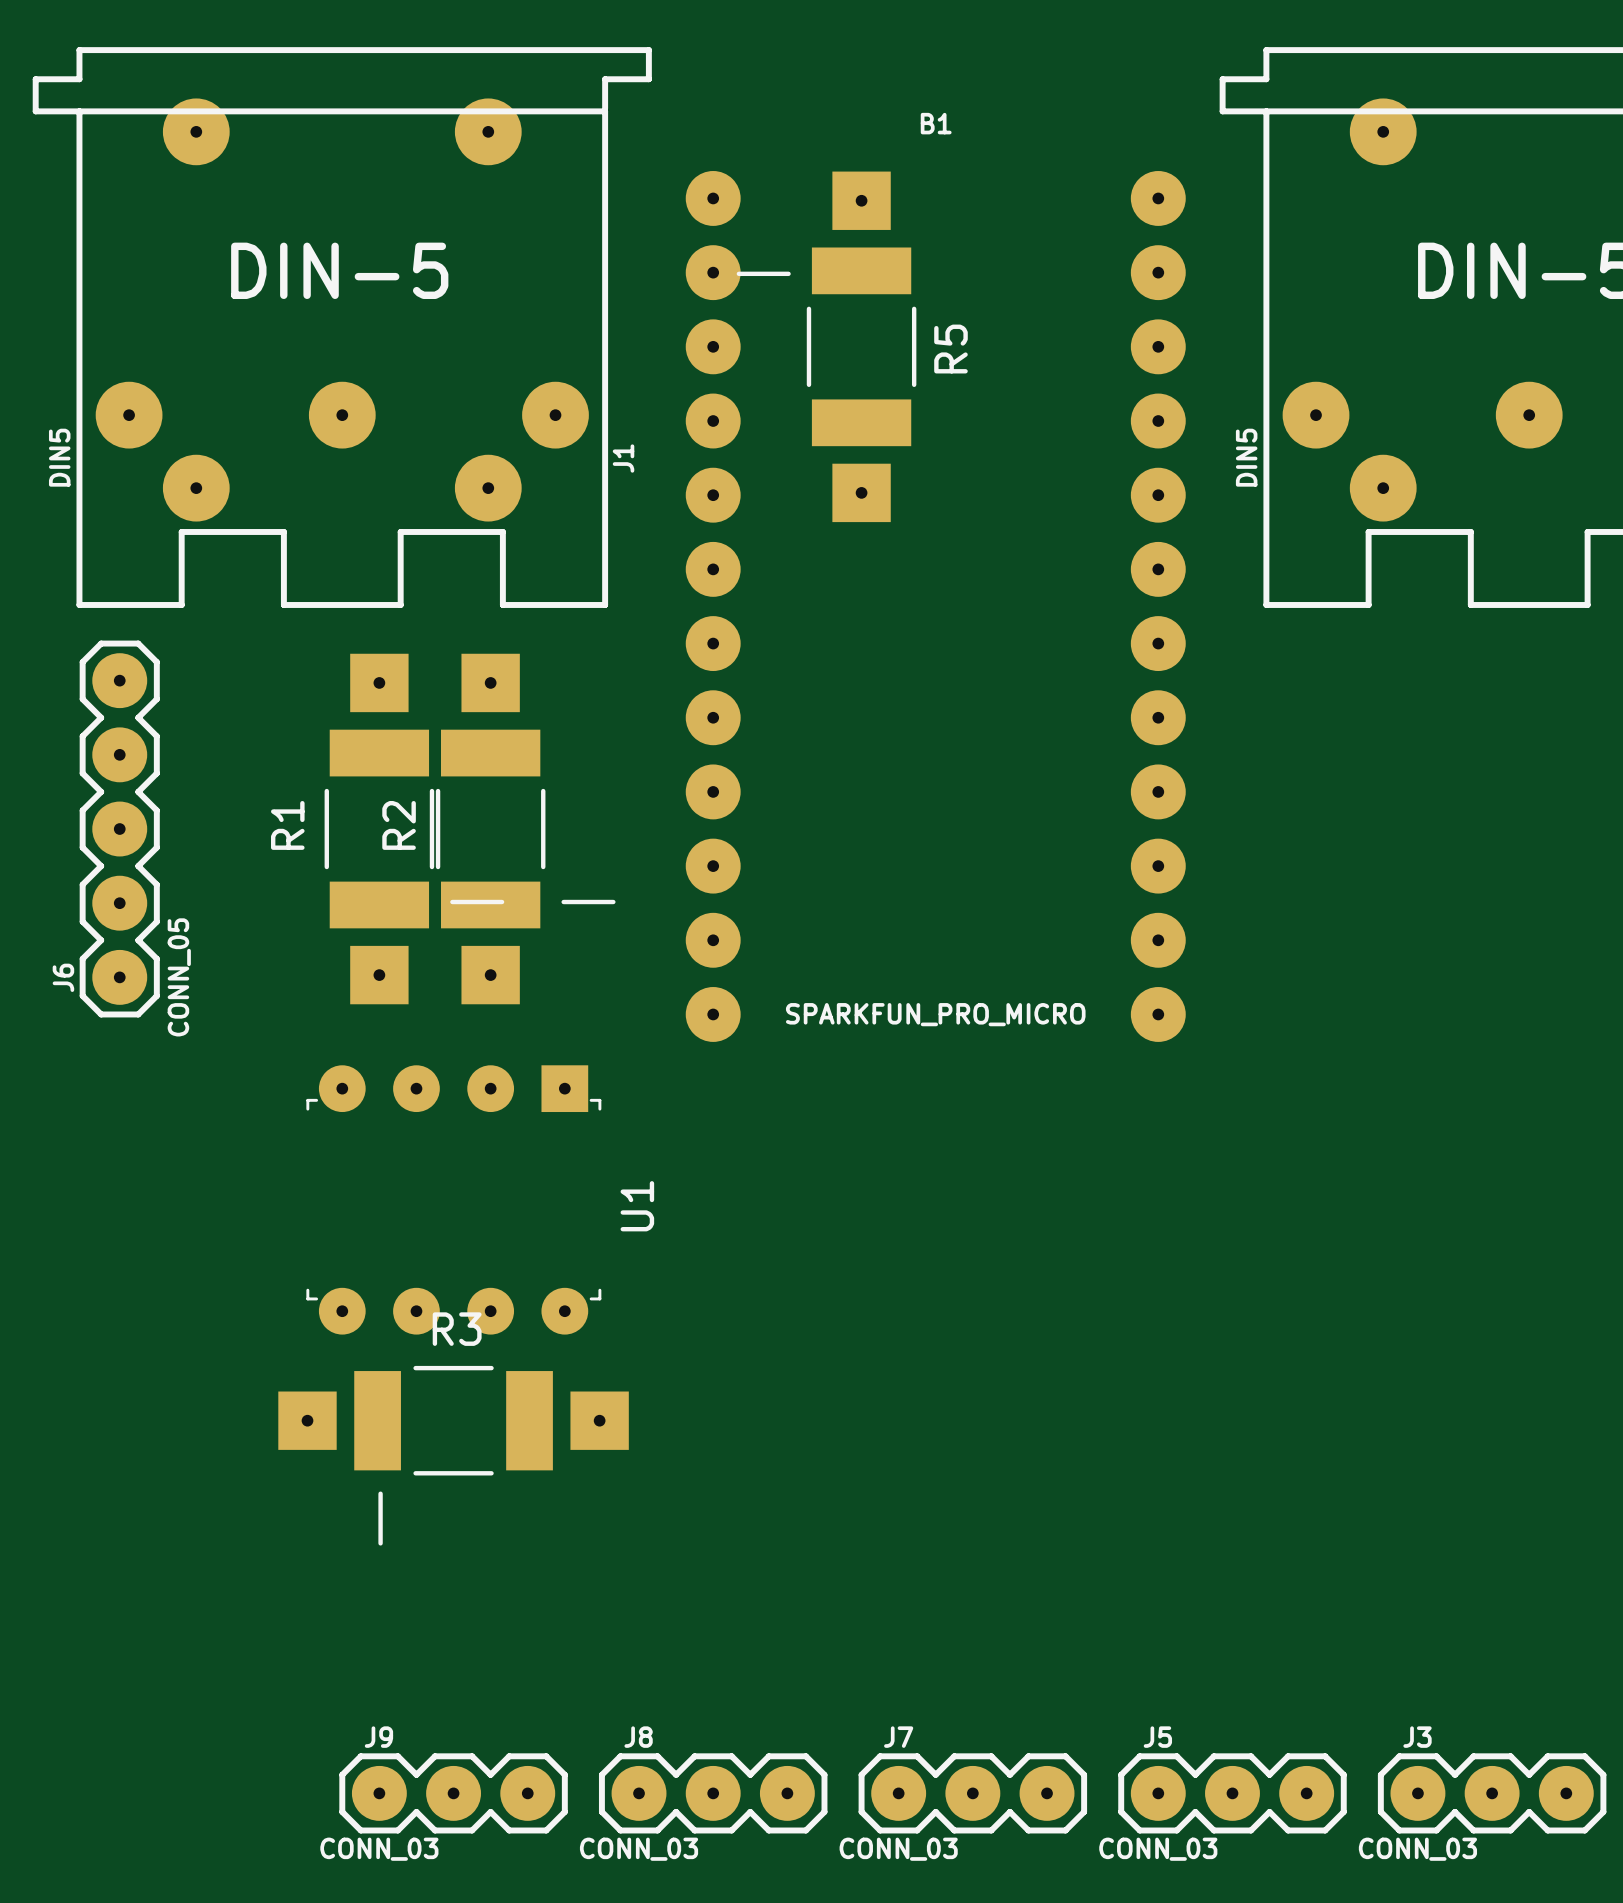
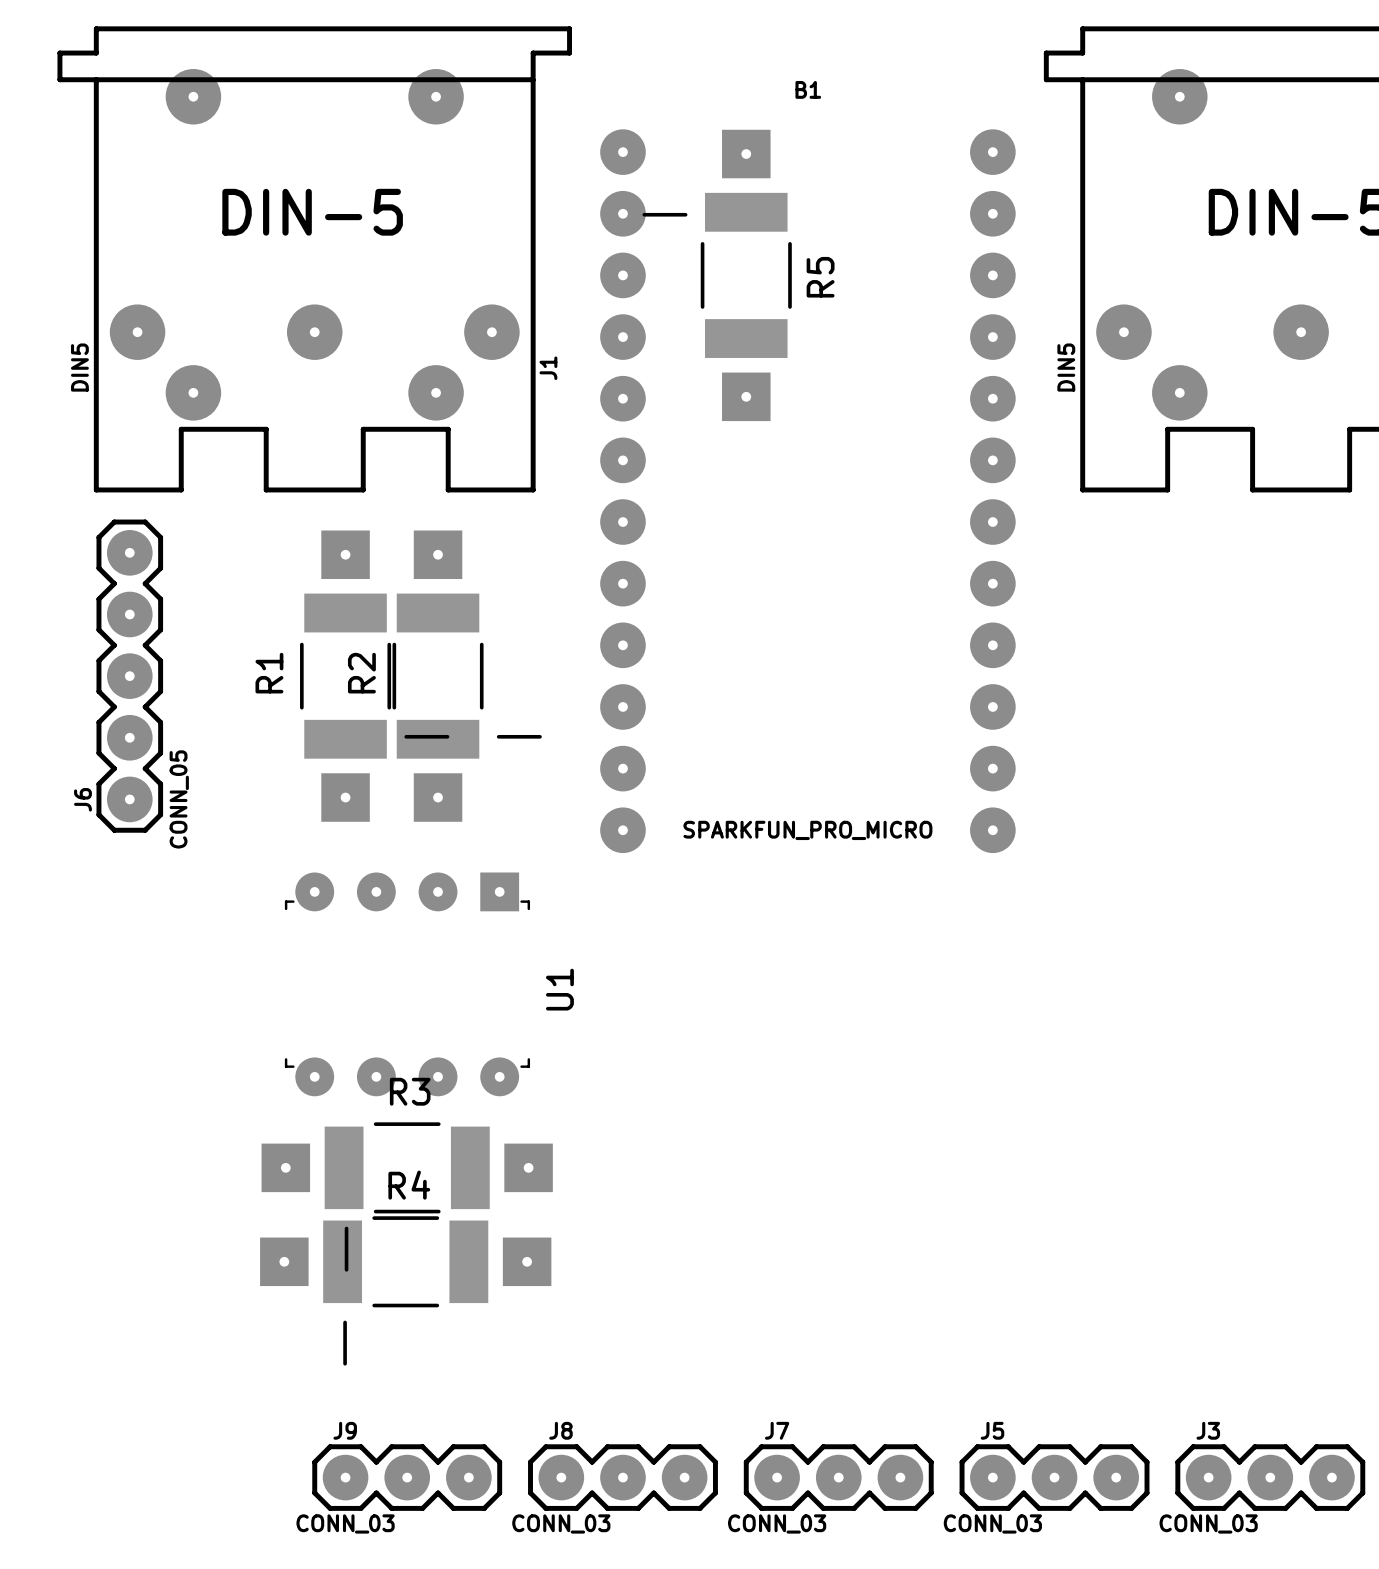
R4: none -> (405, 1290)

